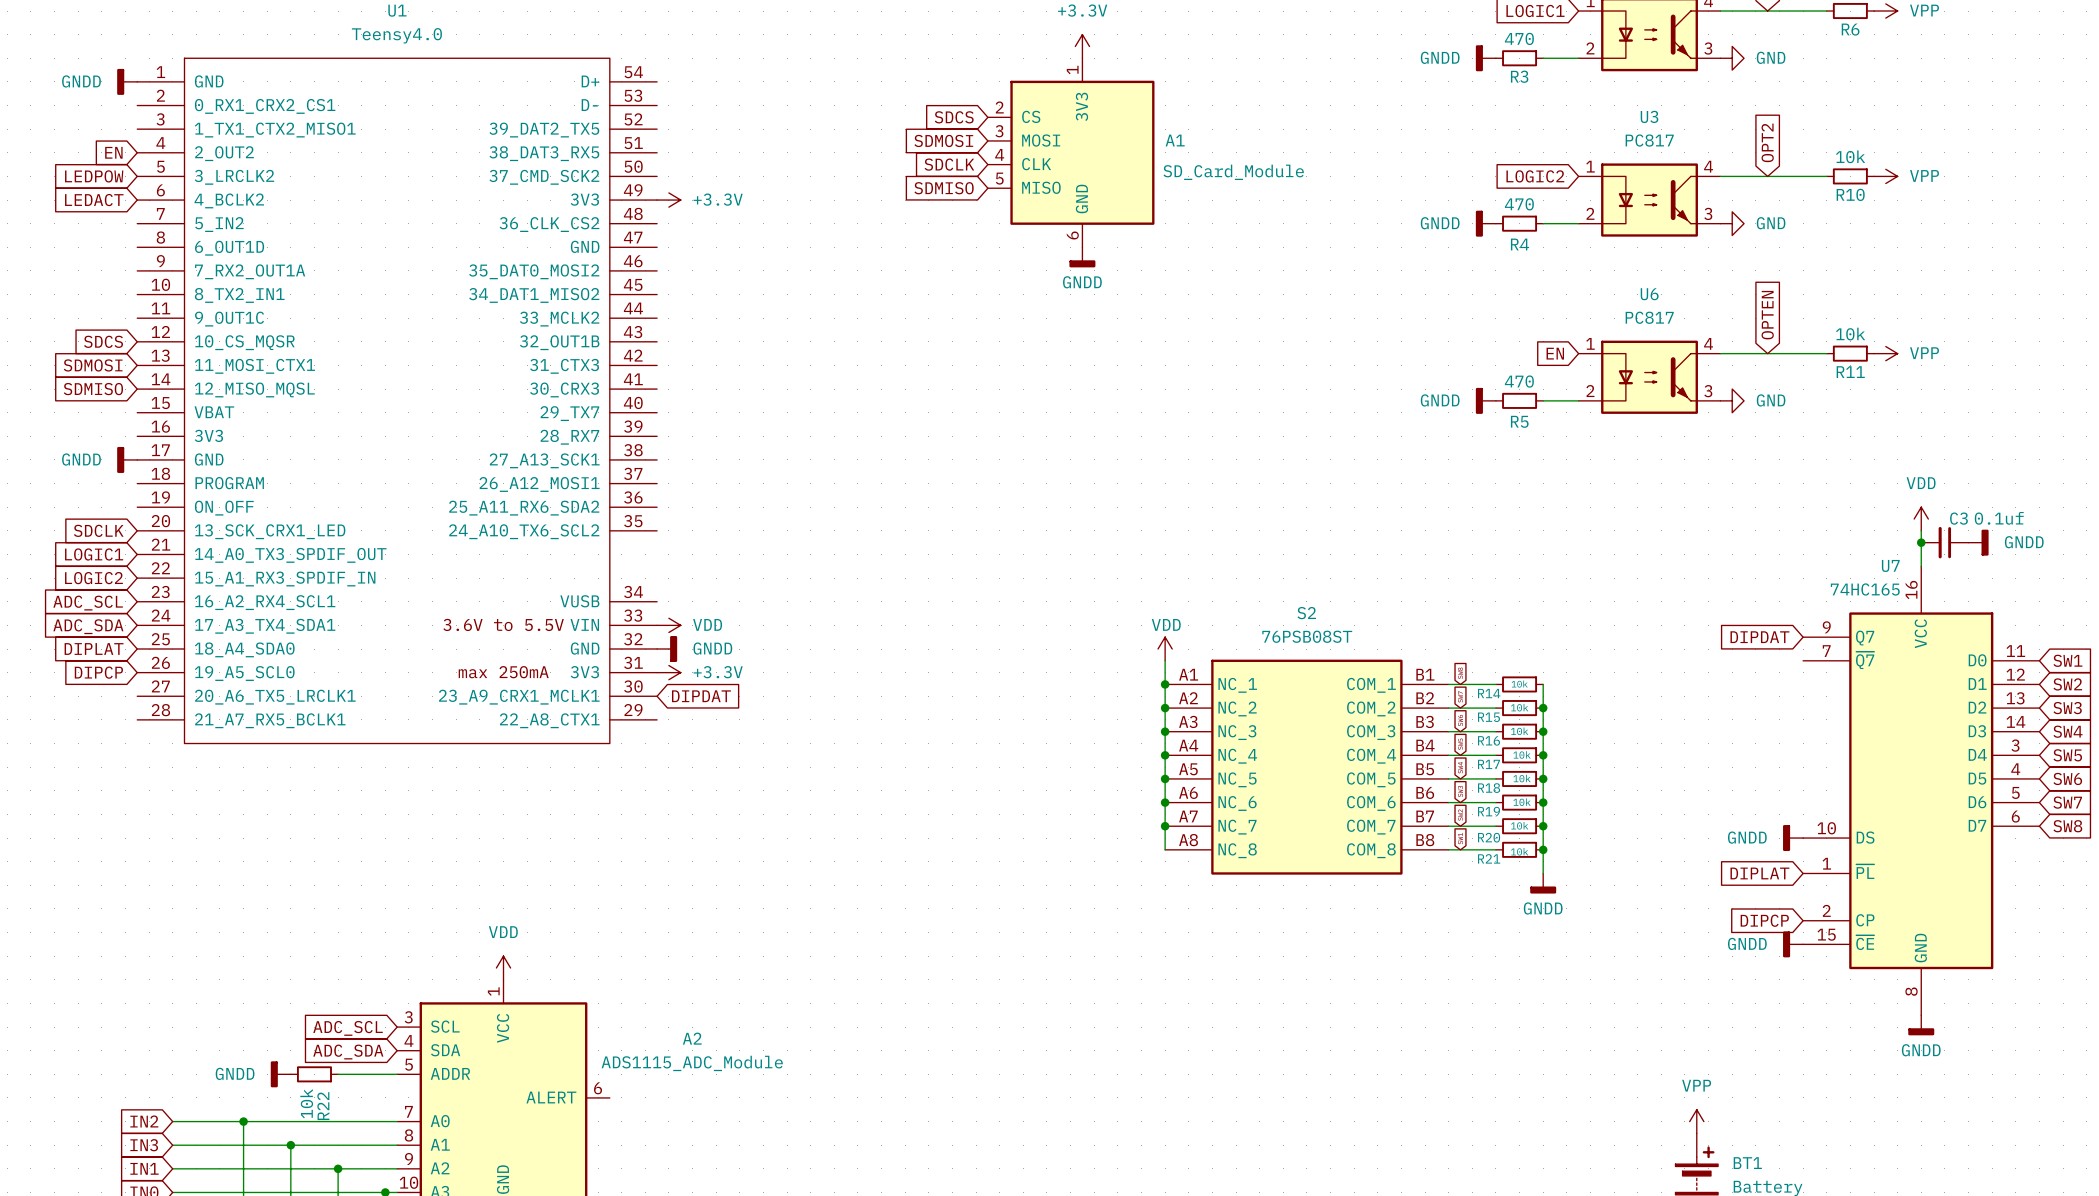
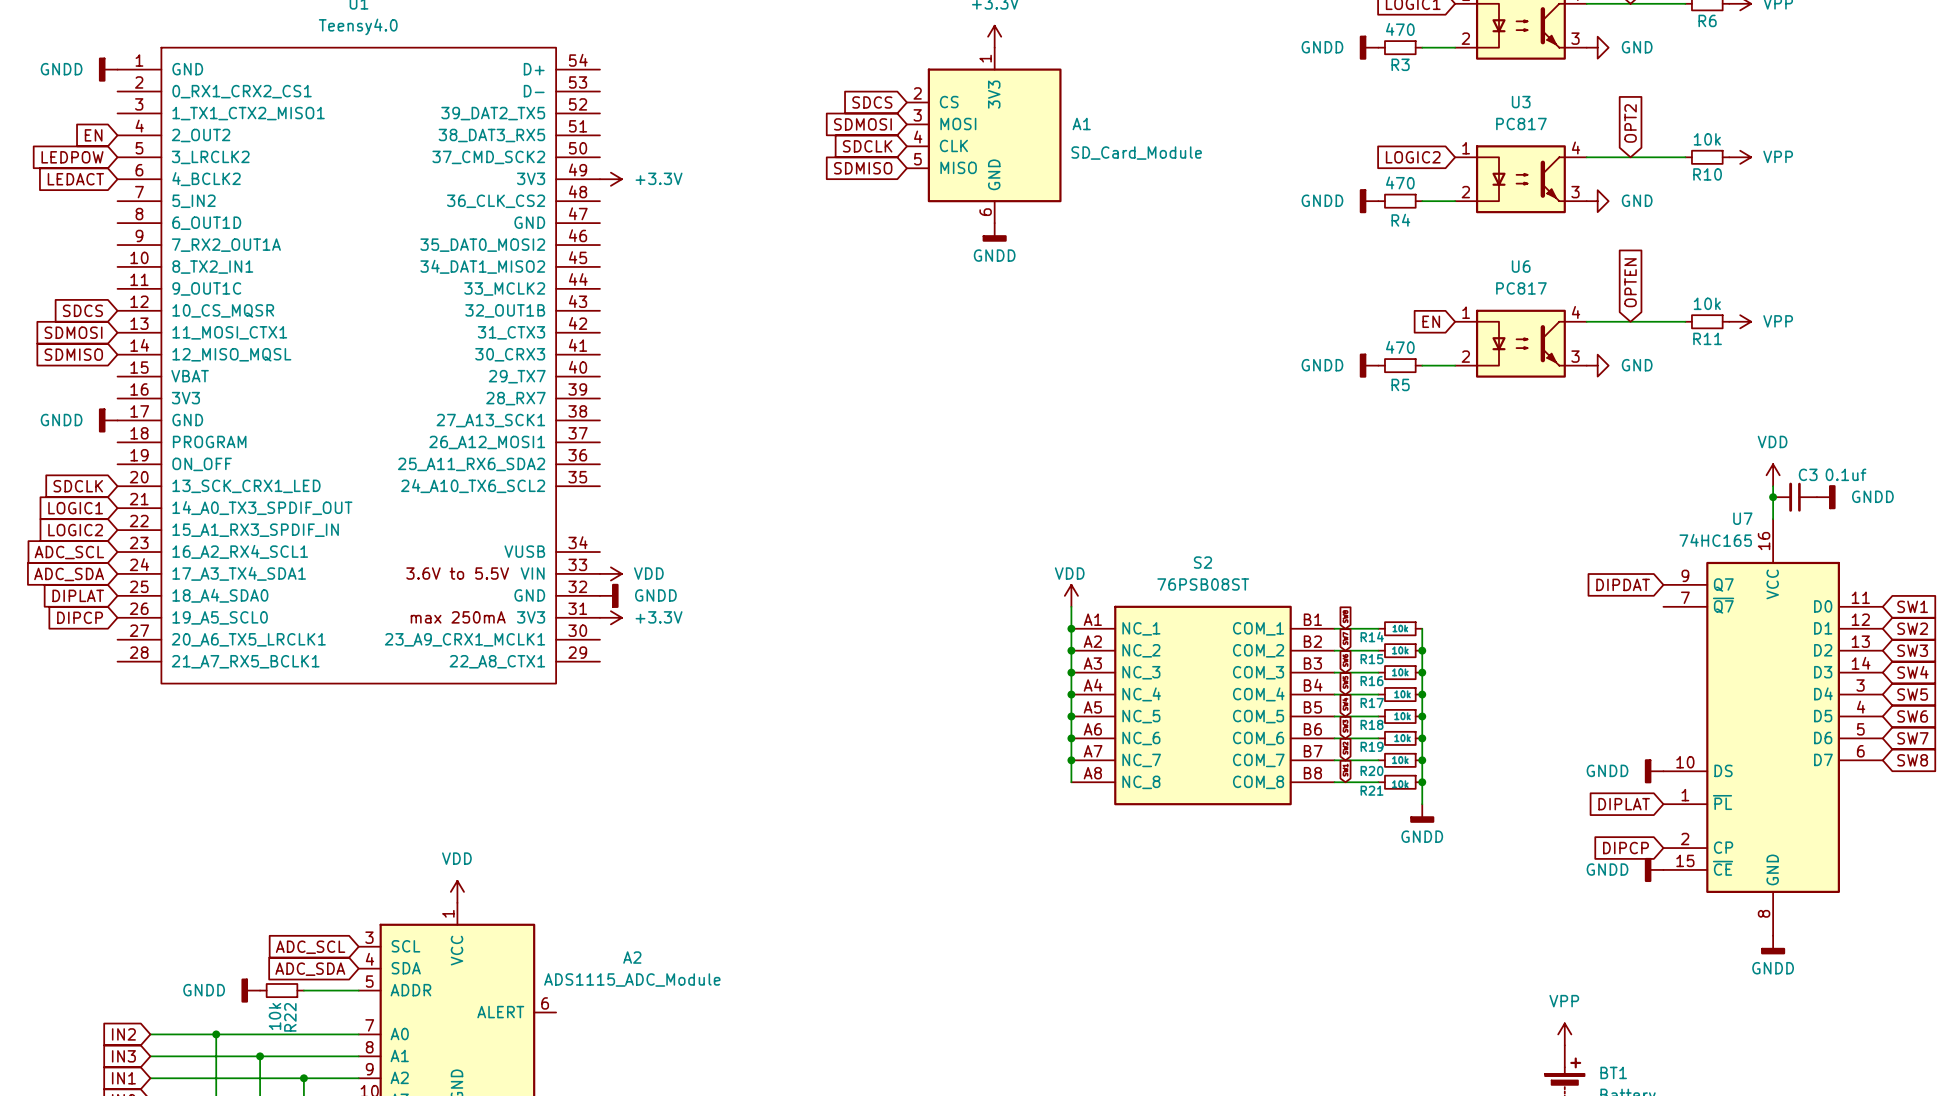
global label: DIPDAT (701, 696) -> none

